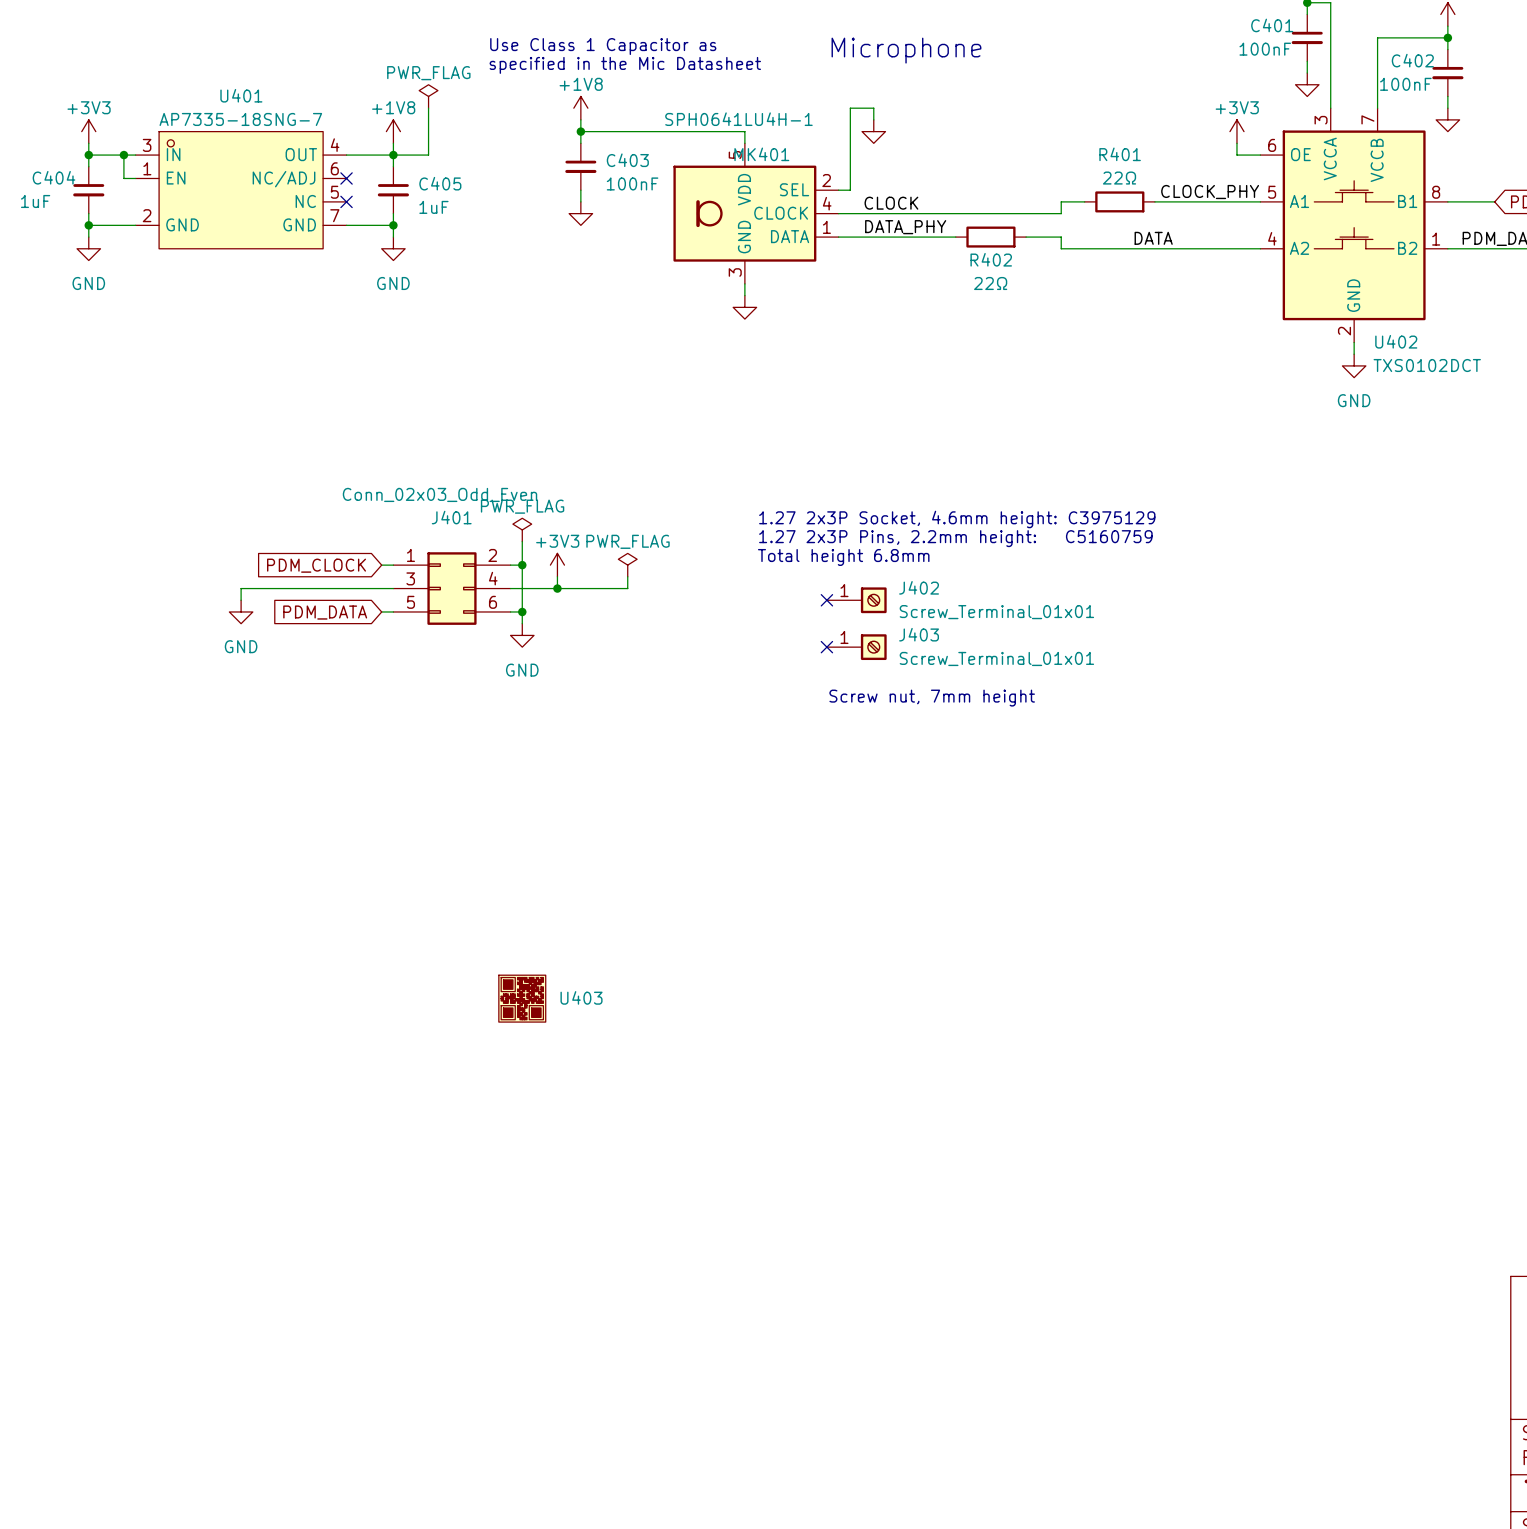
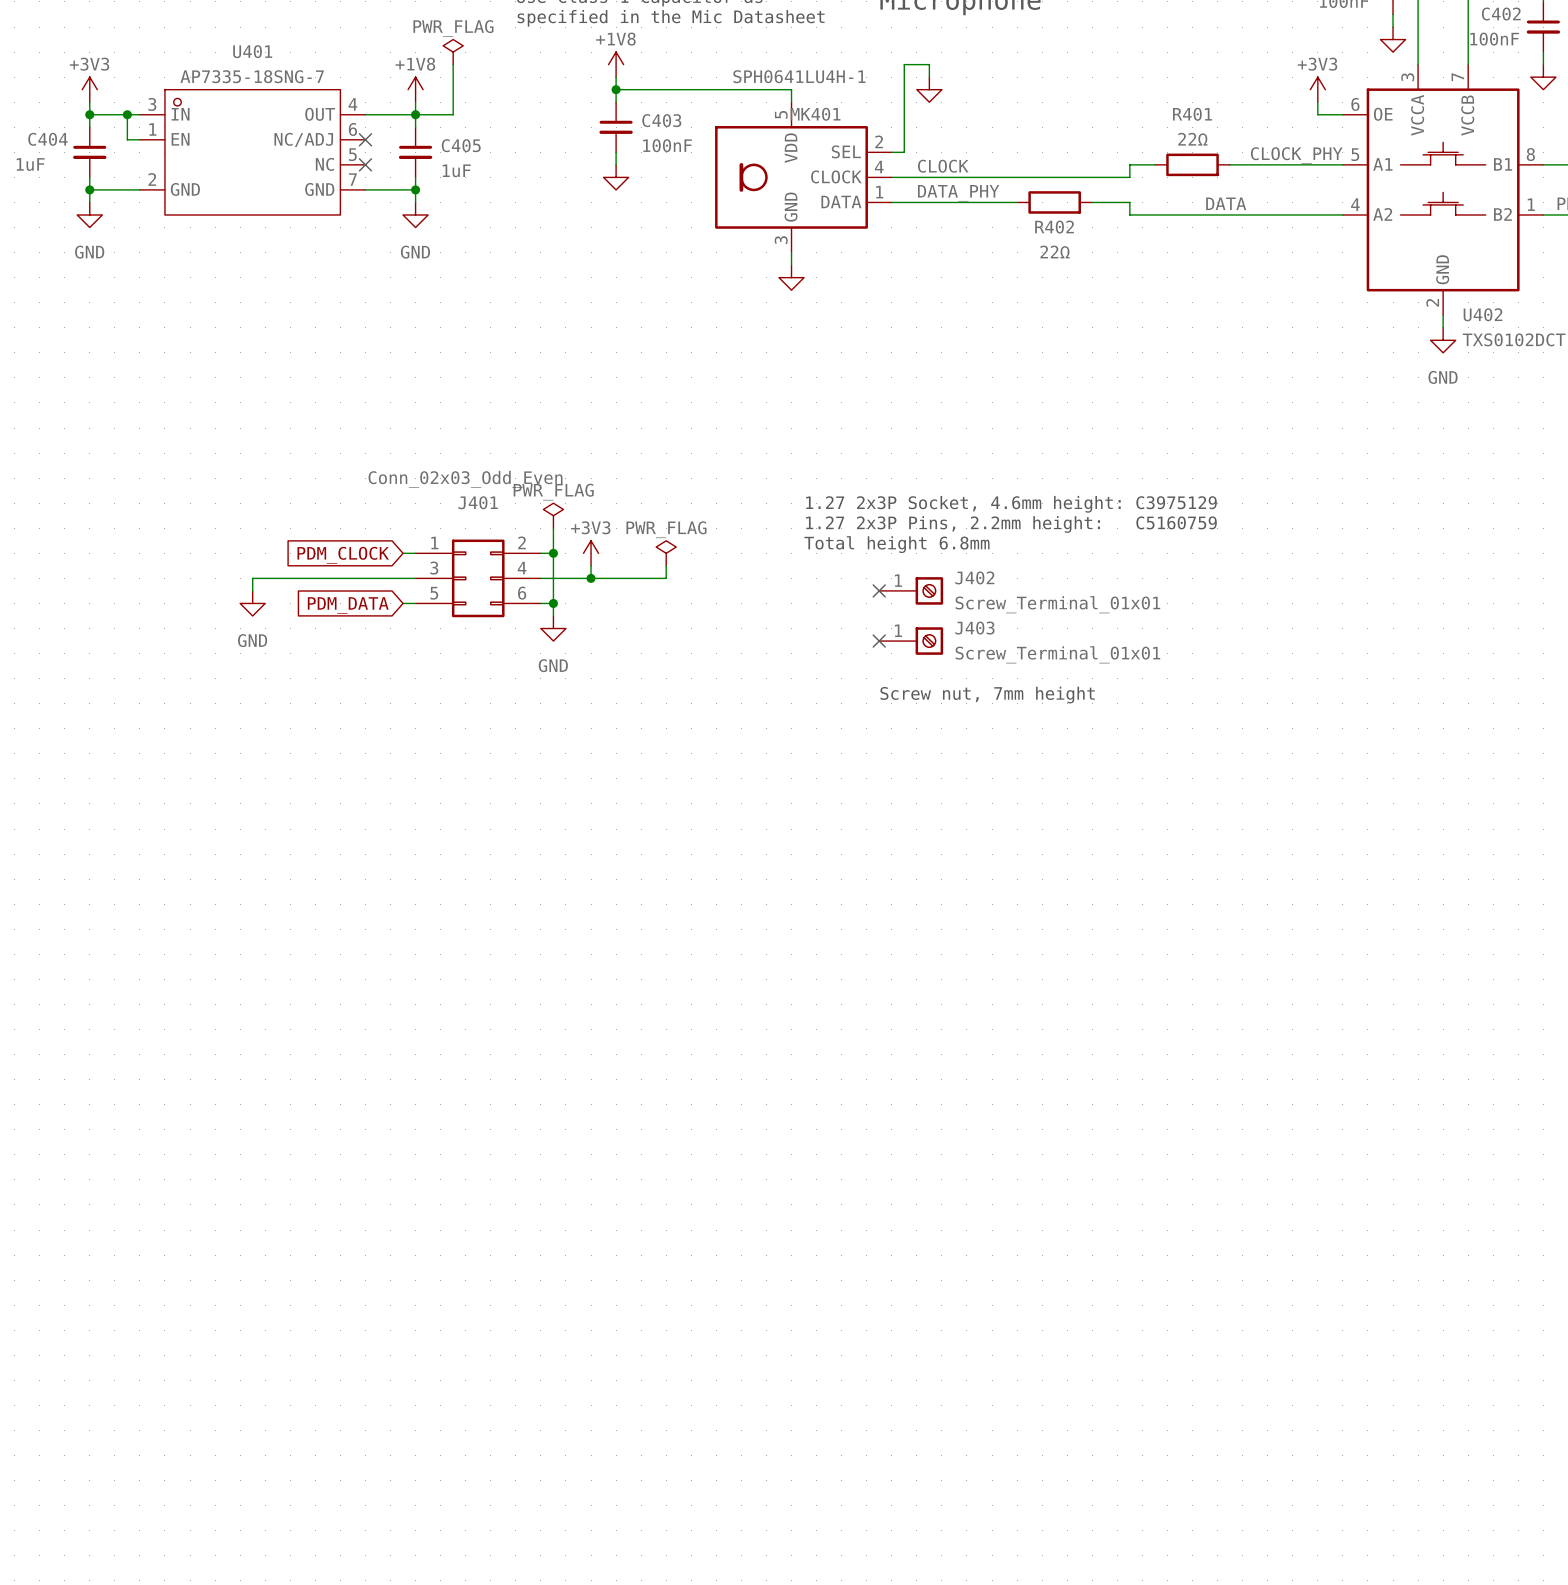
U403: (522, 998) -> none

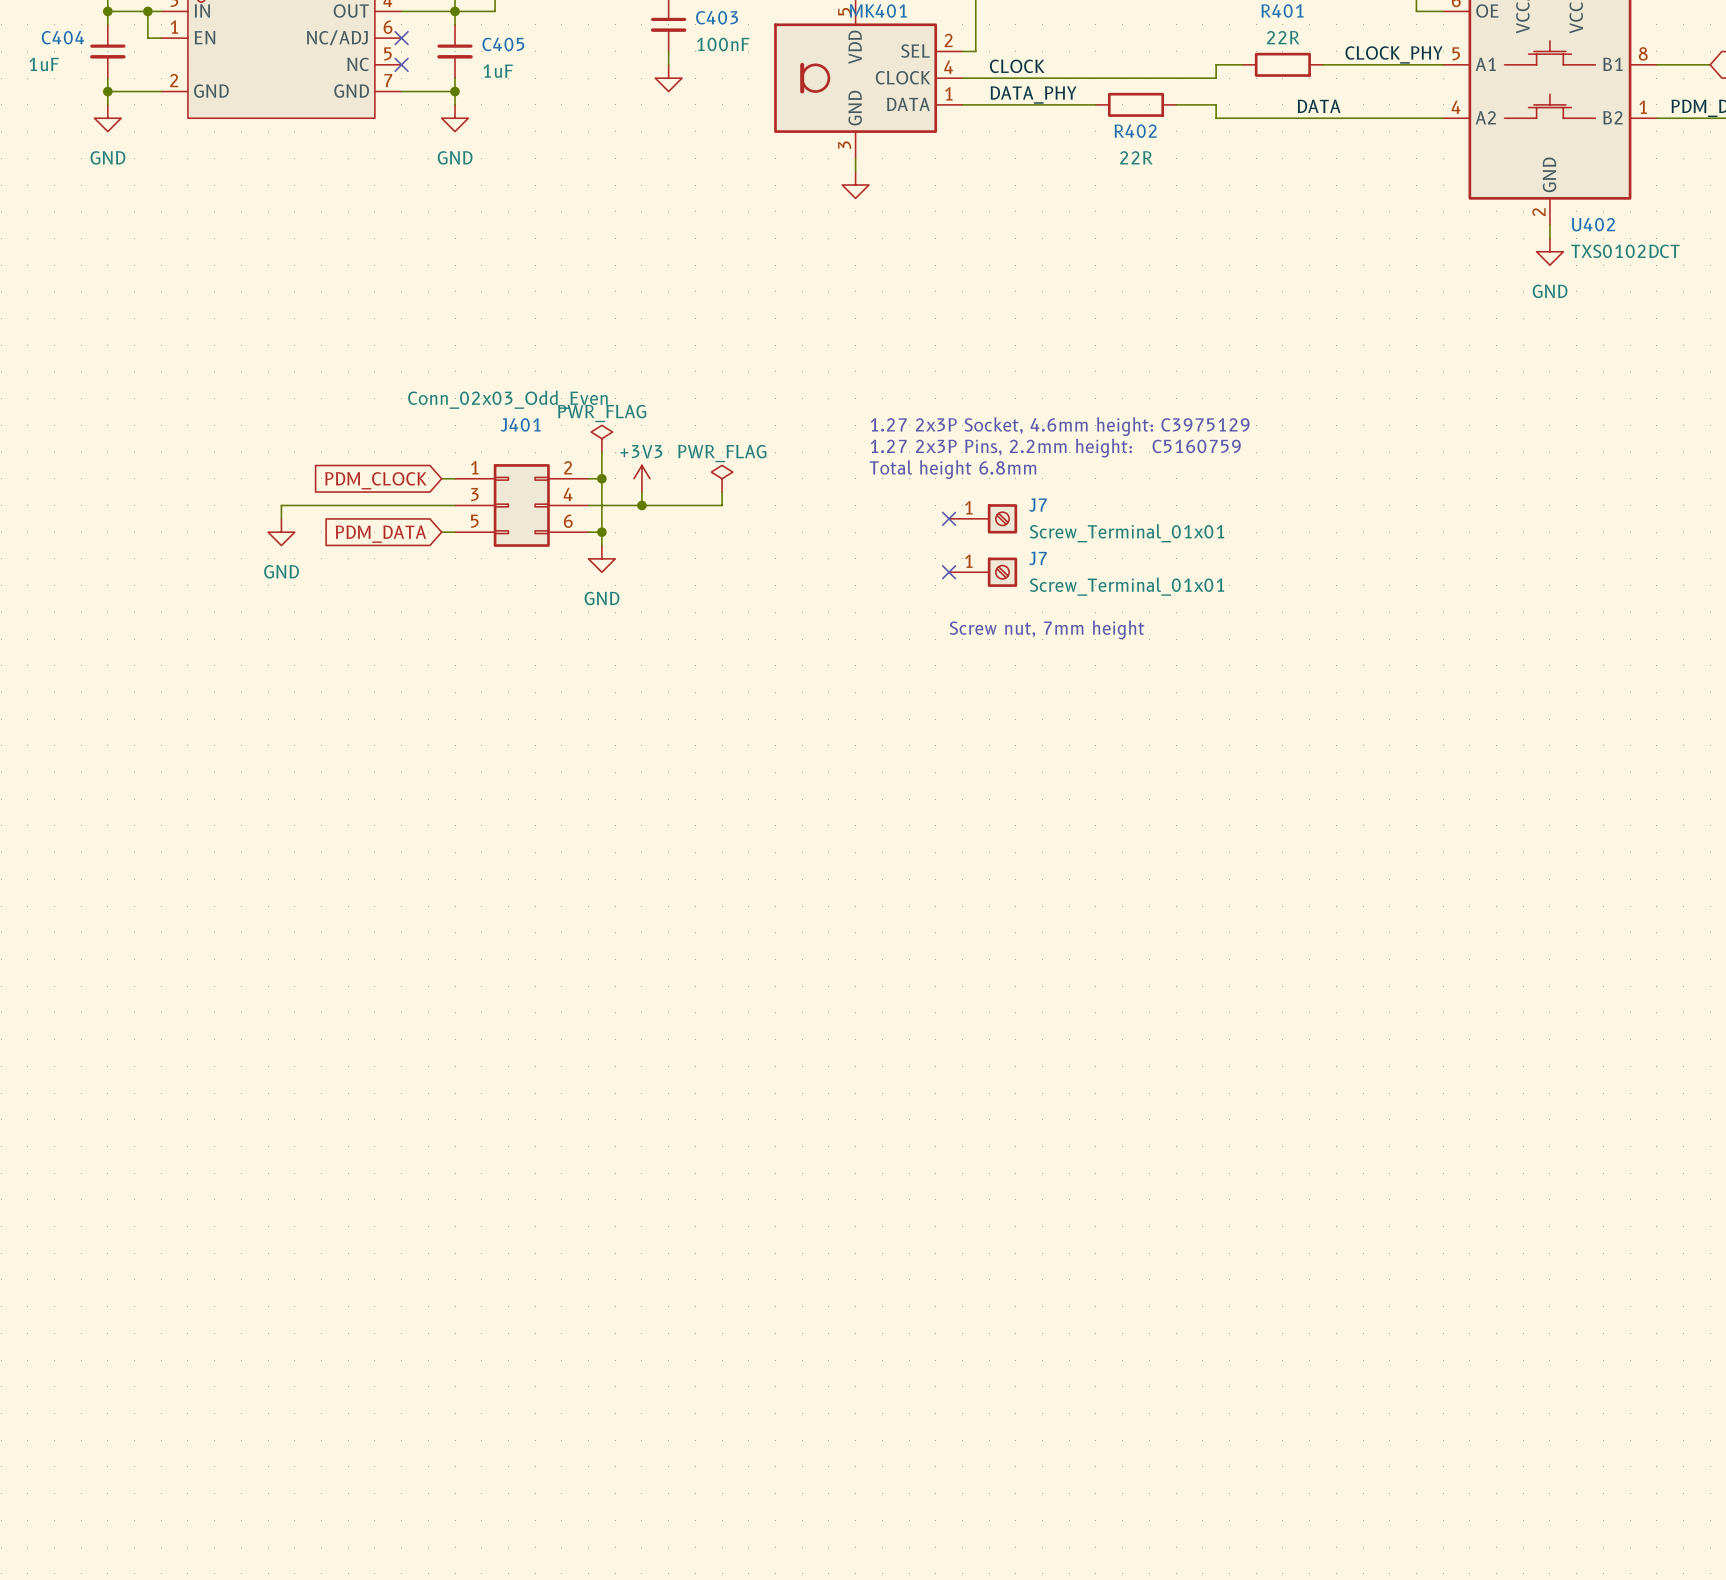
R401 value: 22Ω (1192, 139) -> 22R (1283, 37)
R402 value: 22Ω (1055, 252) -> 22R (1136, 157)
J402 name: J402 (974, 577) -> J7 (1037, 505)
J403 name: J403 (974, 628) -> J7 (1037, 558)

